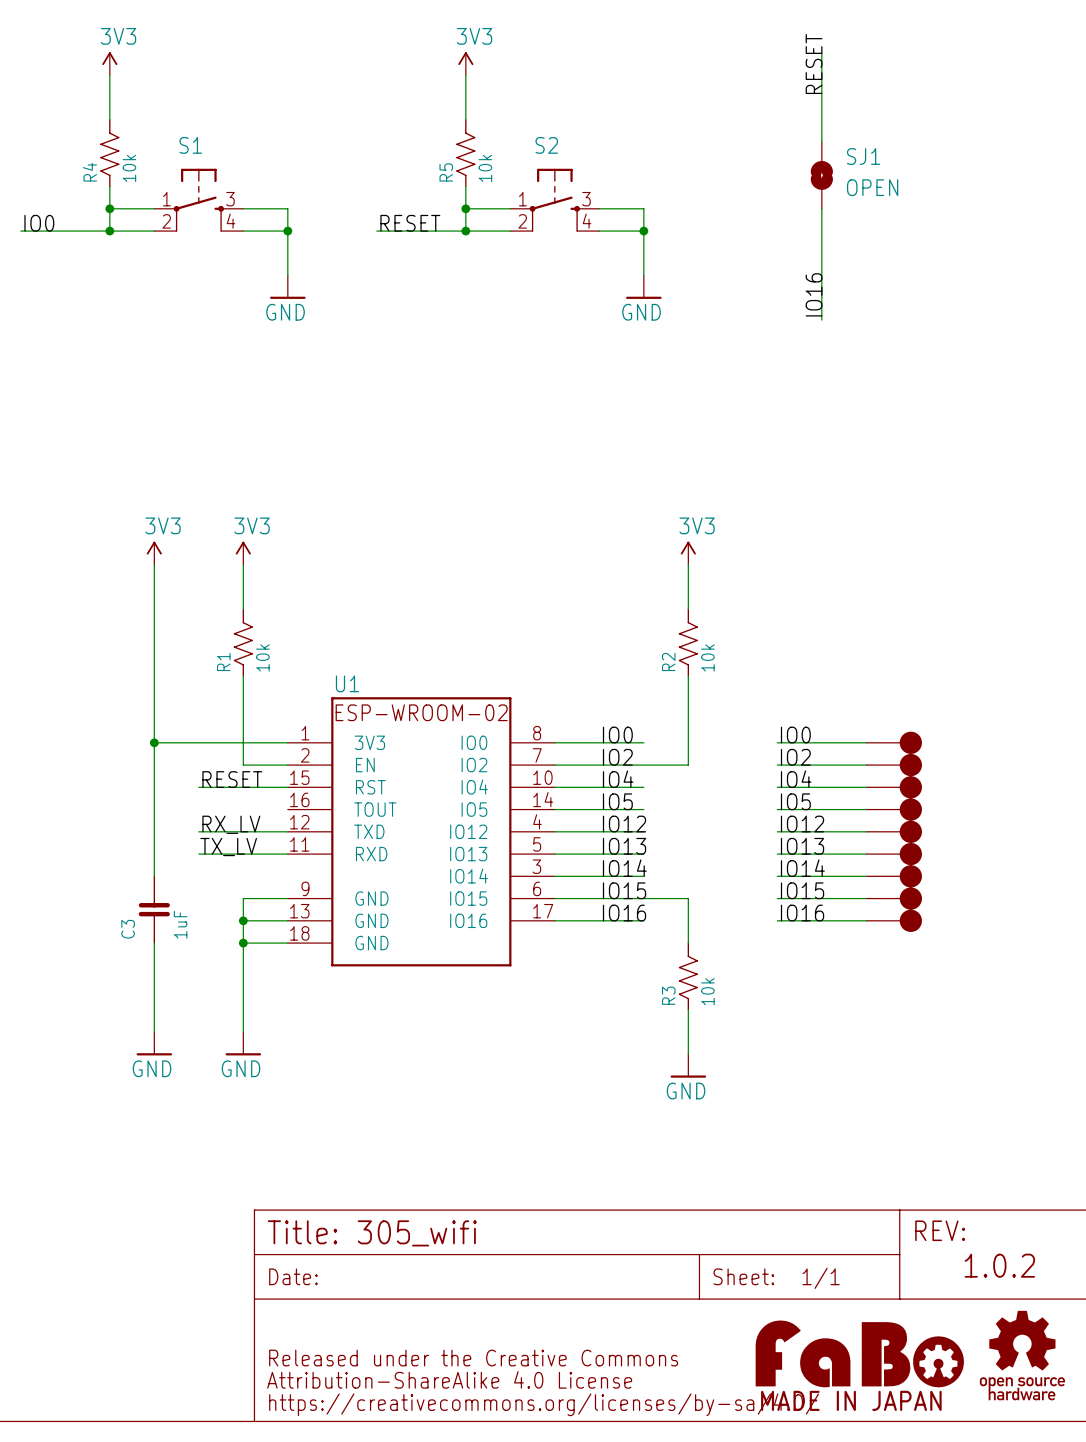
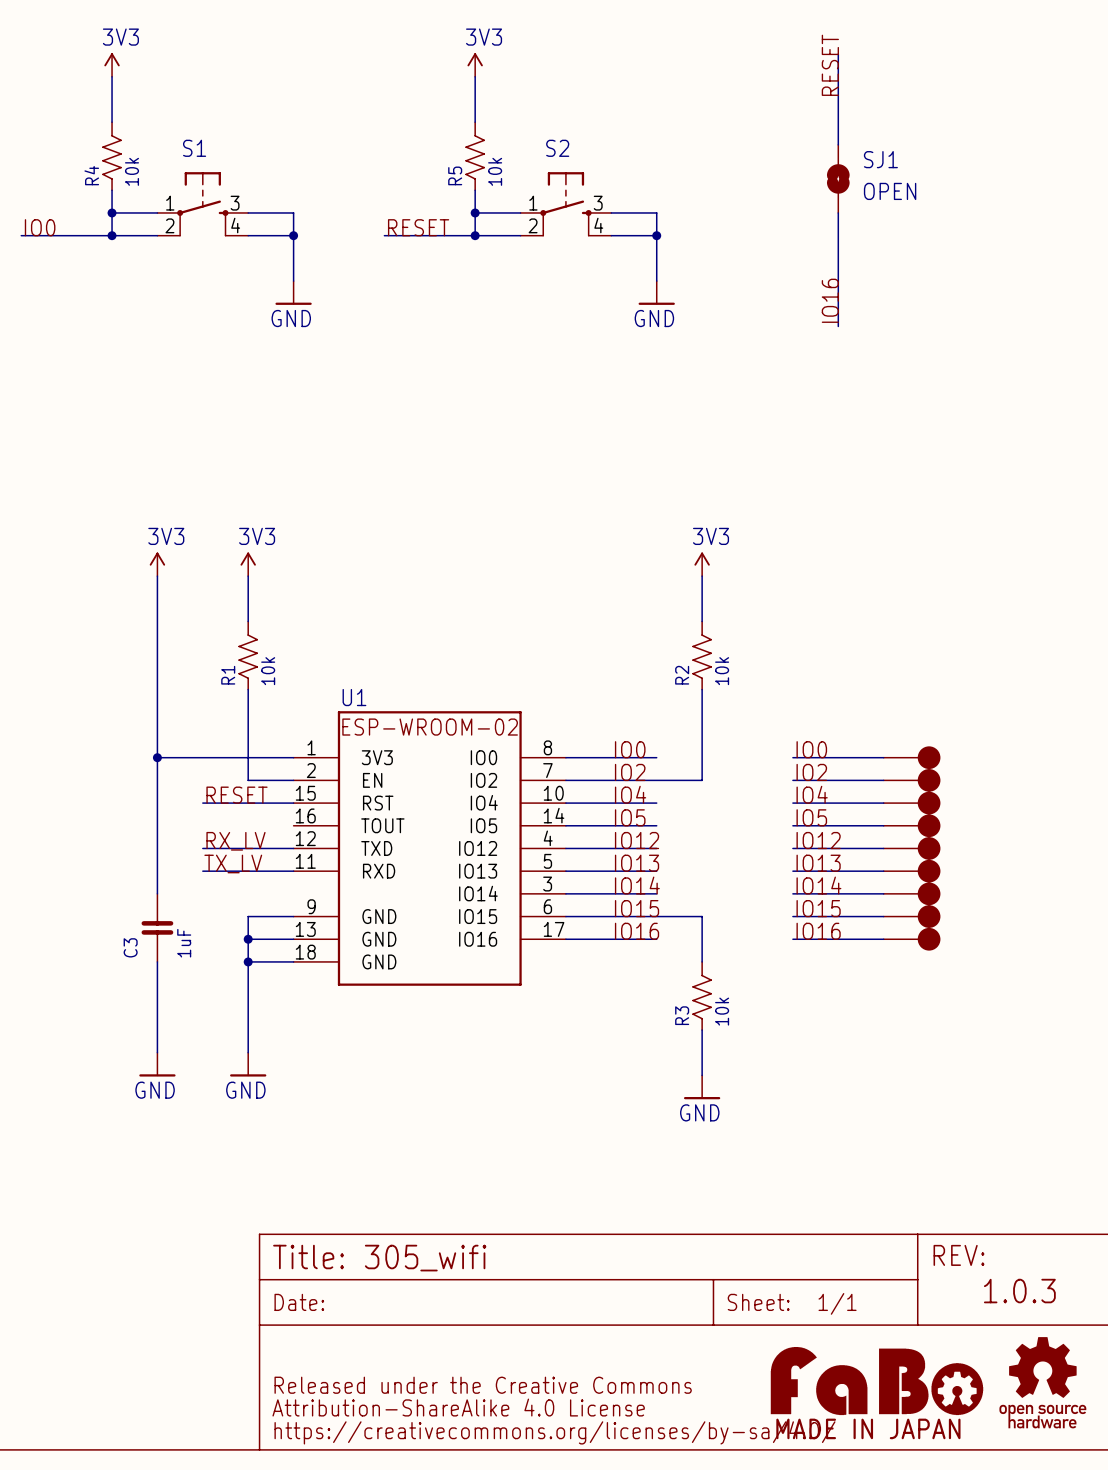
text: 1.0.2 (999, 1265) -> 1.0.3 (1019, 1291)

